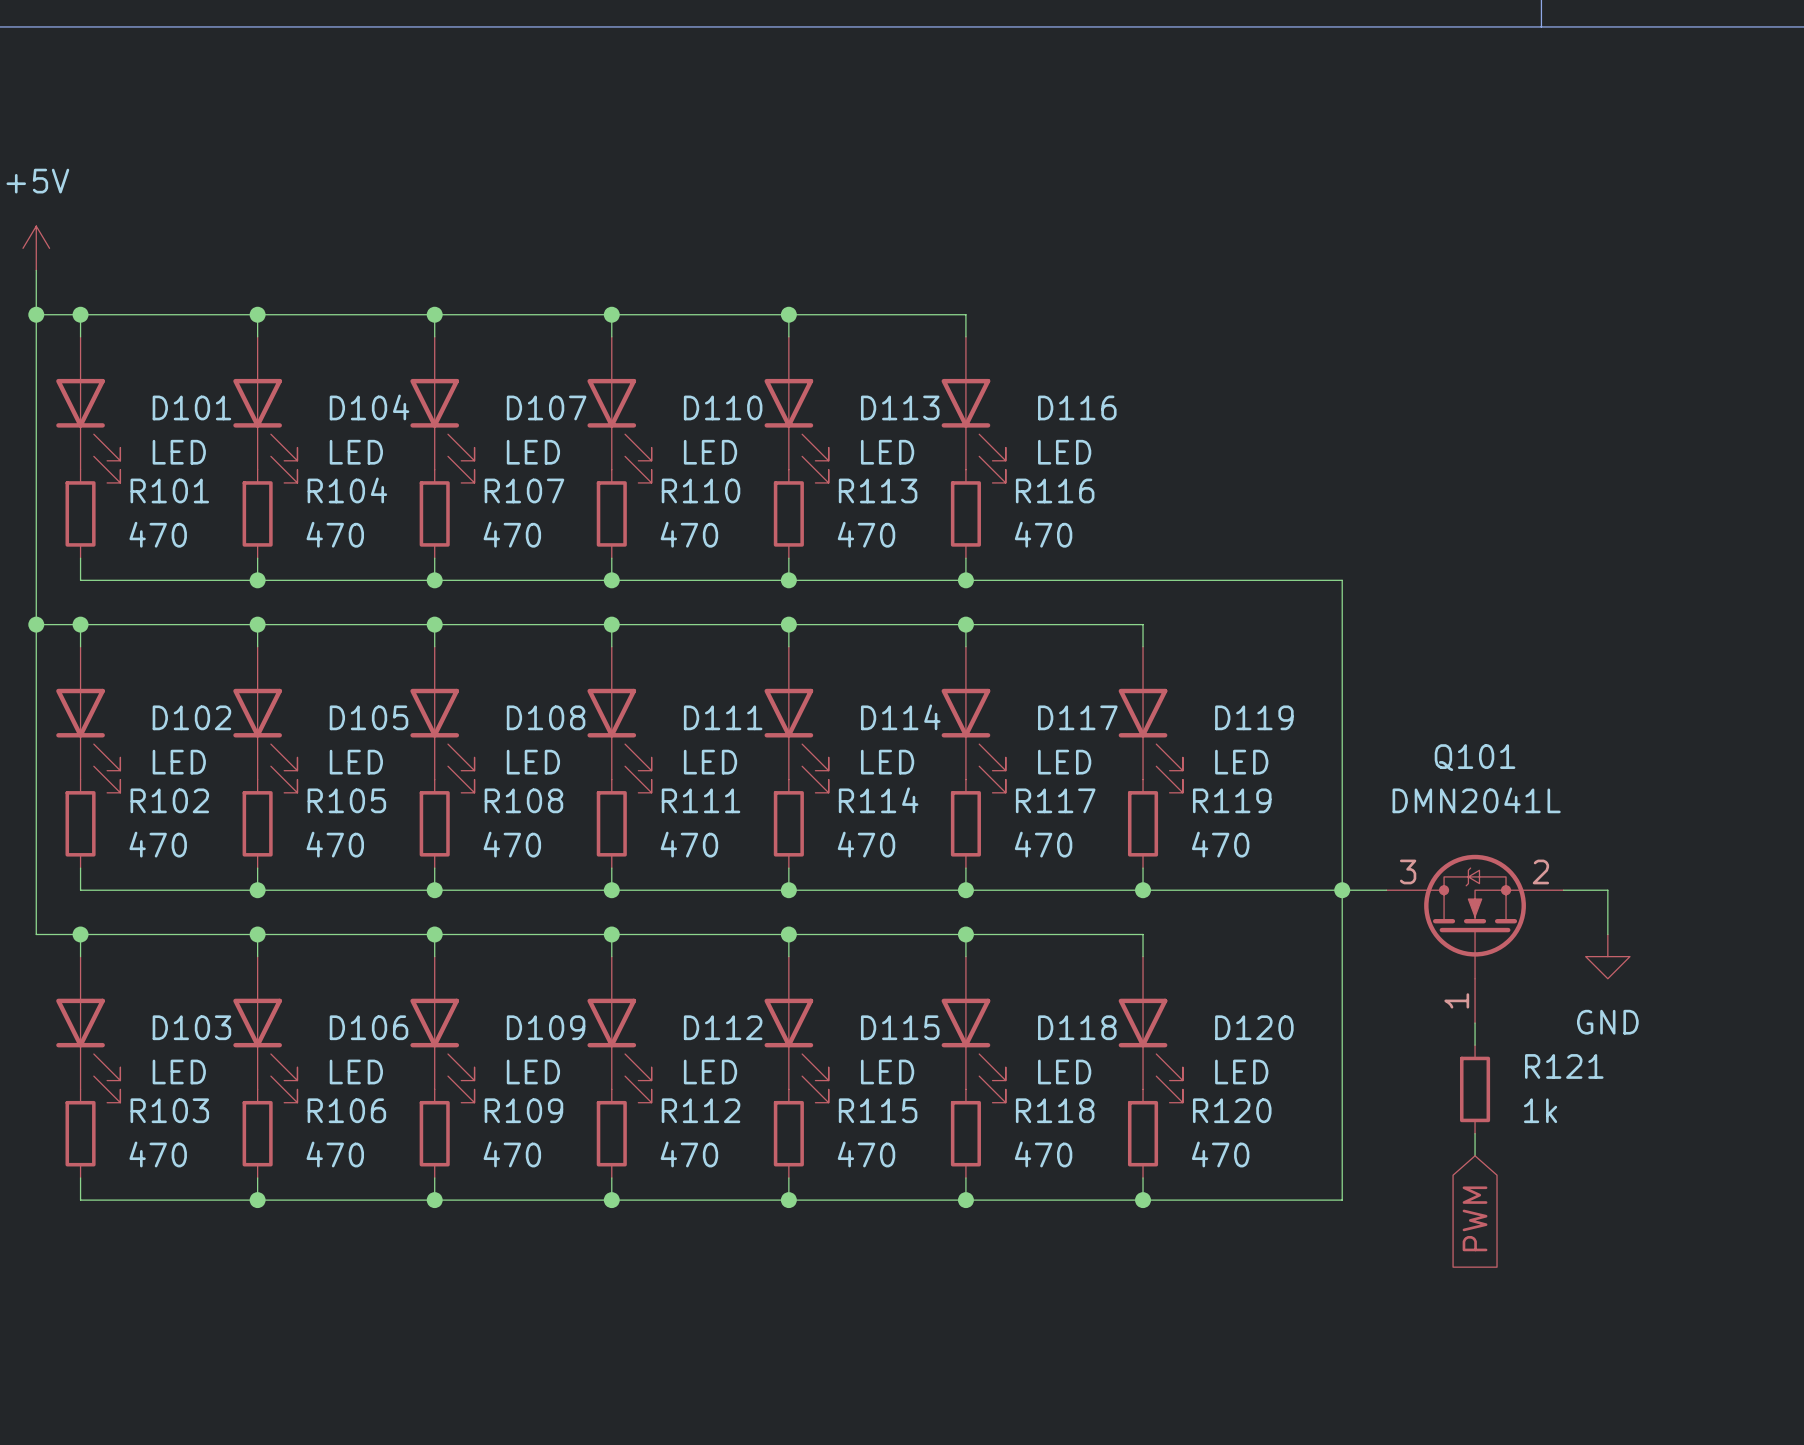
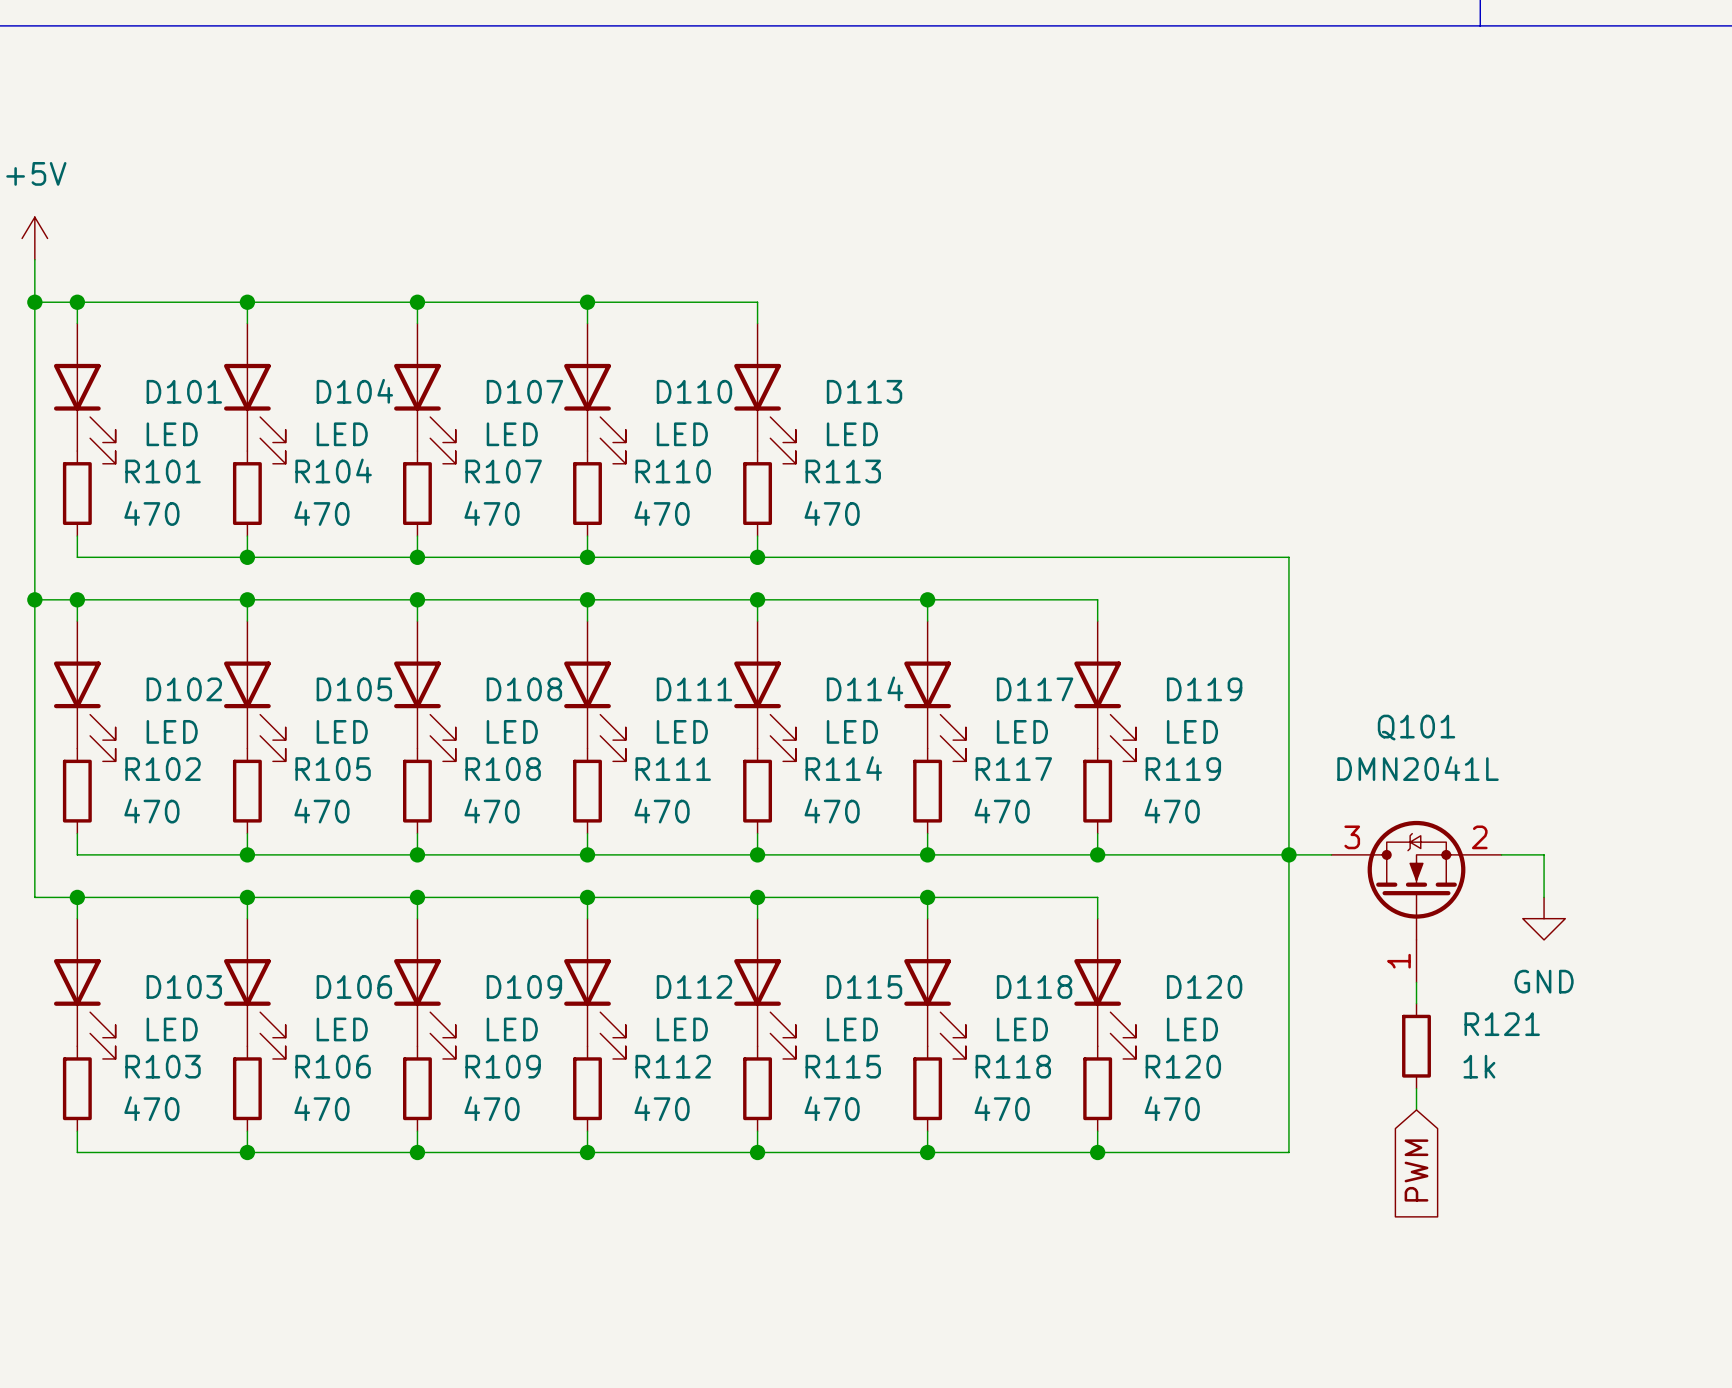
wire: (788, 314) (965, 314) (965, 336) -> none
junction: (788, 314) -> none
D116: LED (973, 409) -> none
R116: 470 (965, 513) -> none
wire: (965, 558) (965, 580) -> none
junction: (965, 580) -> none

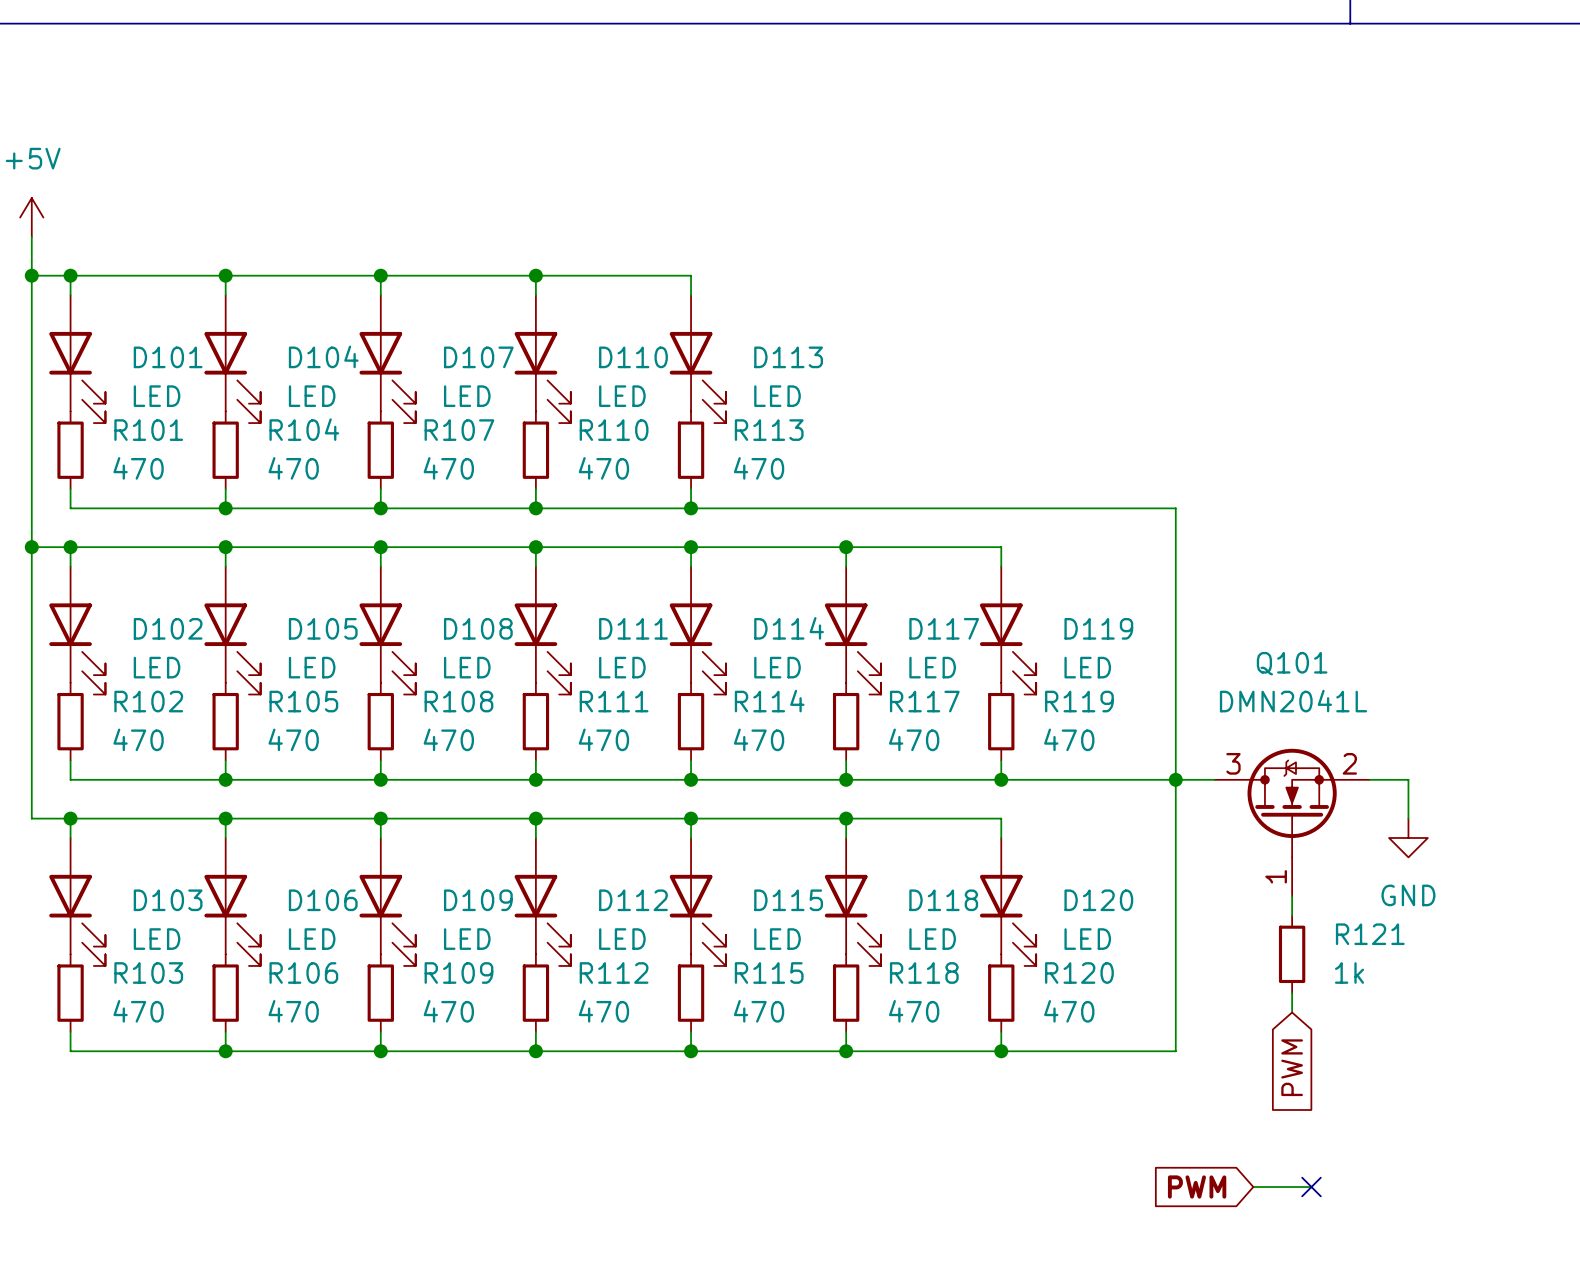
global label: none -> PWM (1197, 1187)
wire: none -> (1253, 1187) (1311, 1187)
no-connect mark: none -> (1311, 1187)

